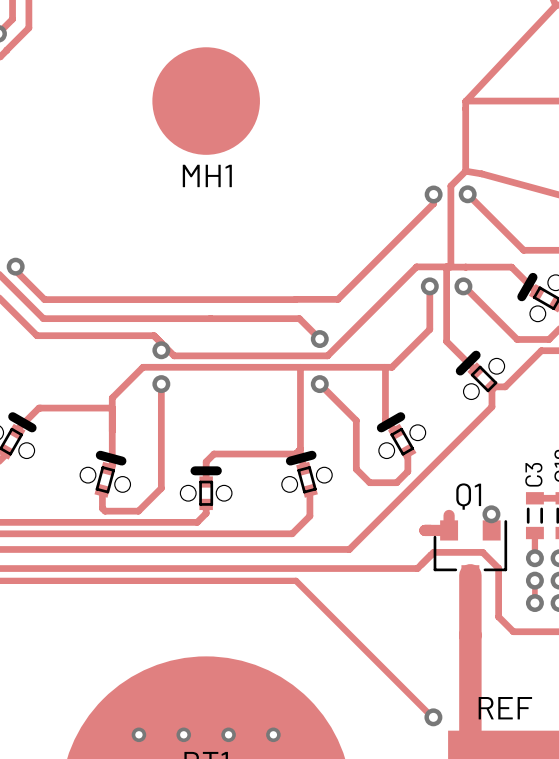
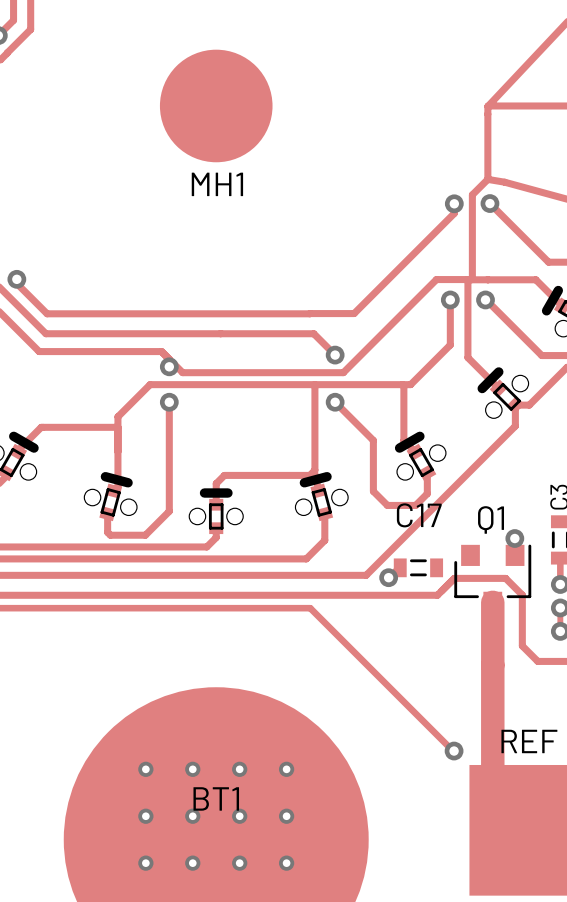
track: (449, 515) (449, 530) (424, 530) -> none
C17: none -> (418, 567)
via: none -> (388, 577)

